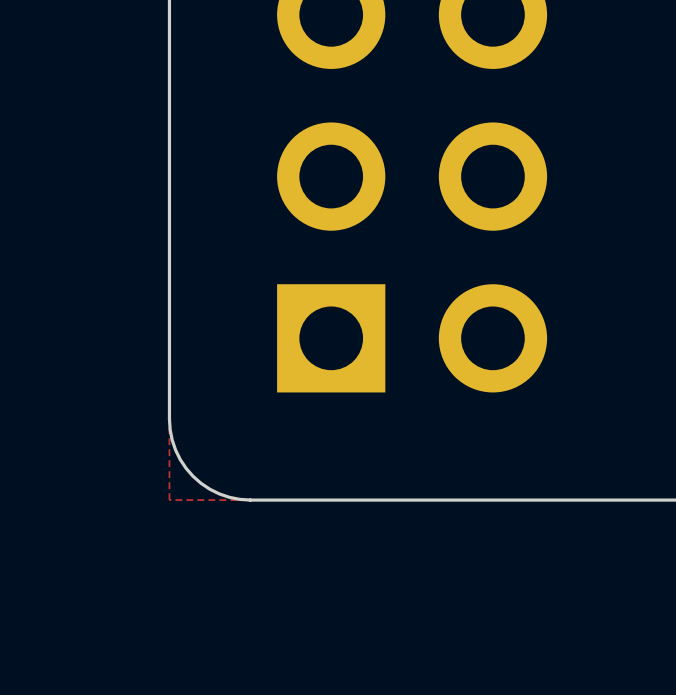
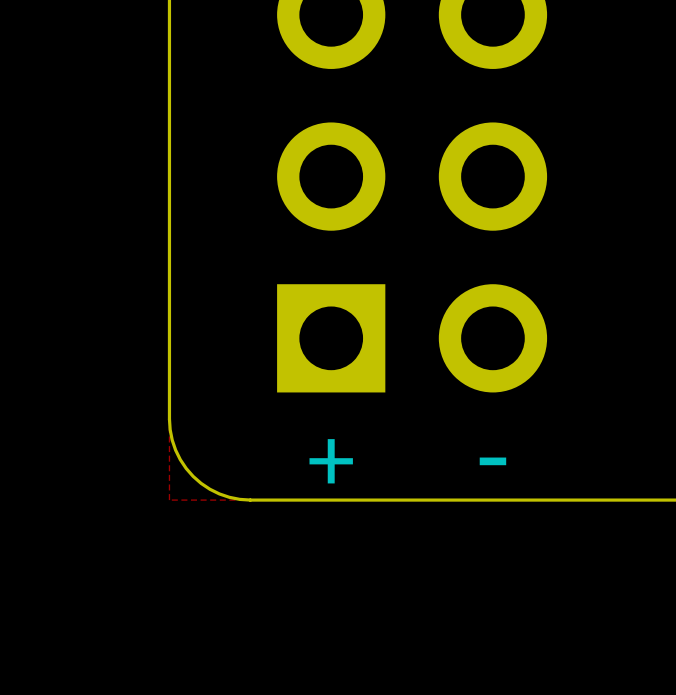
text: none -> + (331, 461)
text: none -> - (492, 461)

